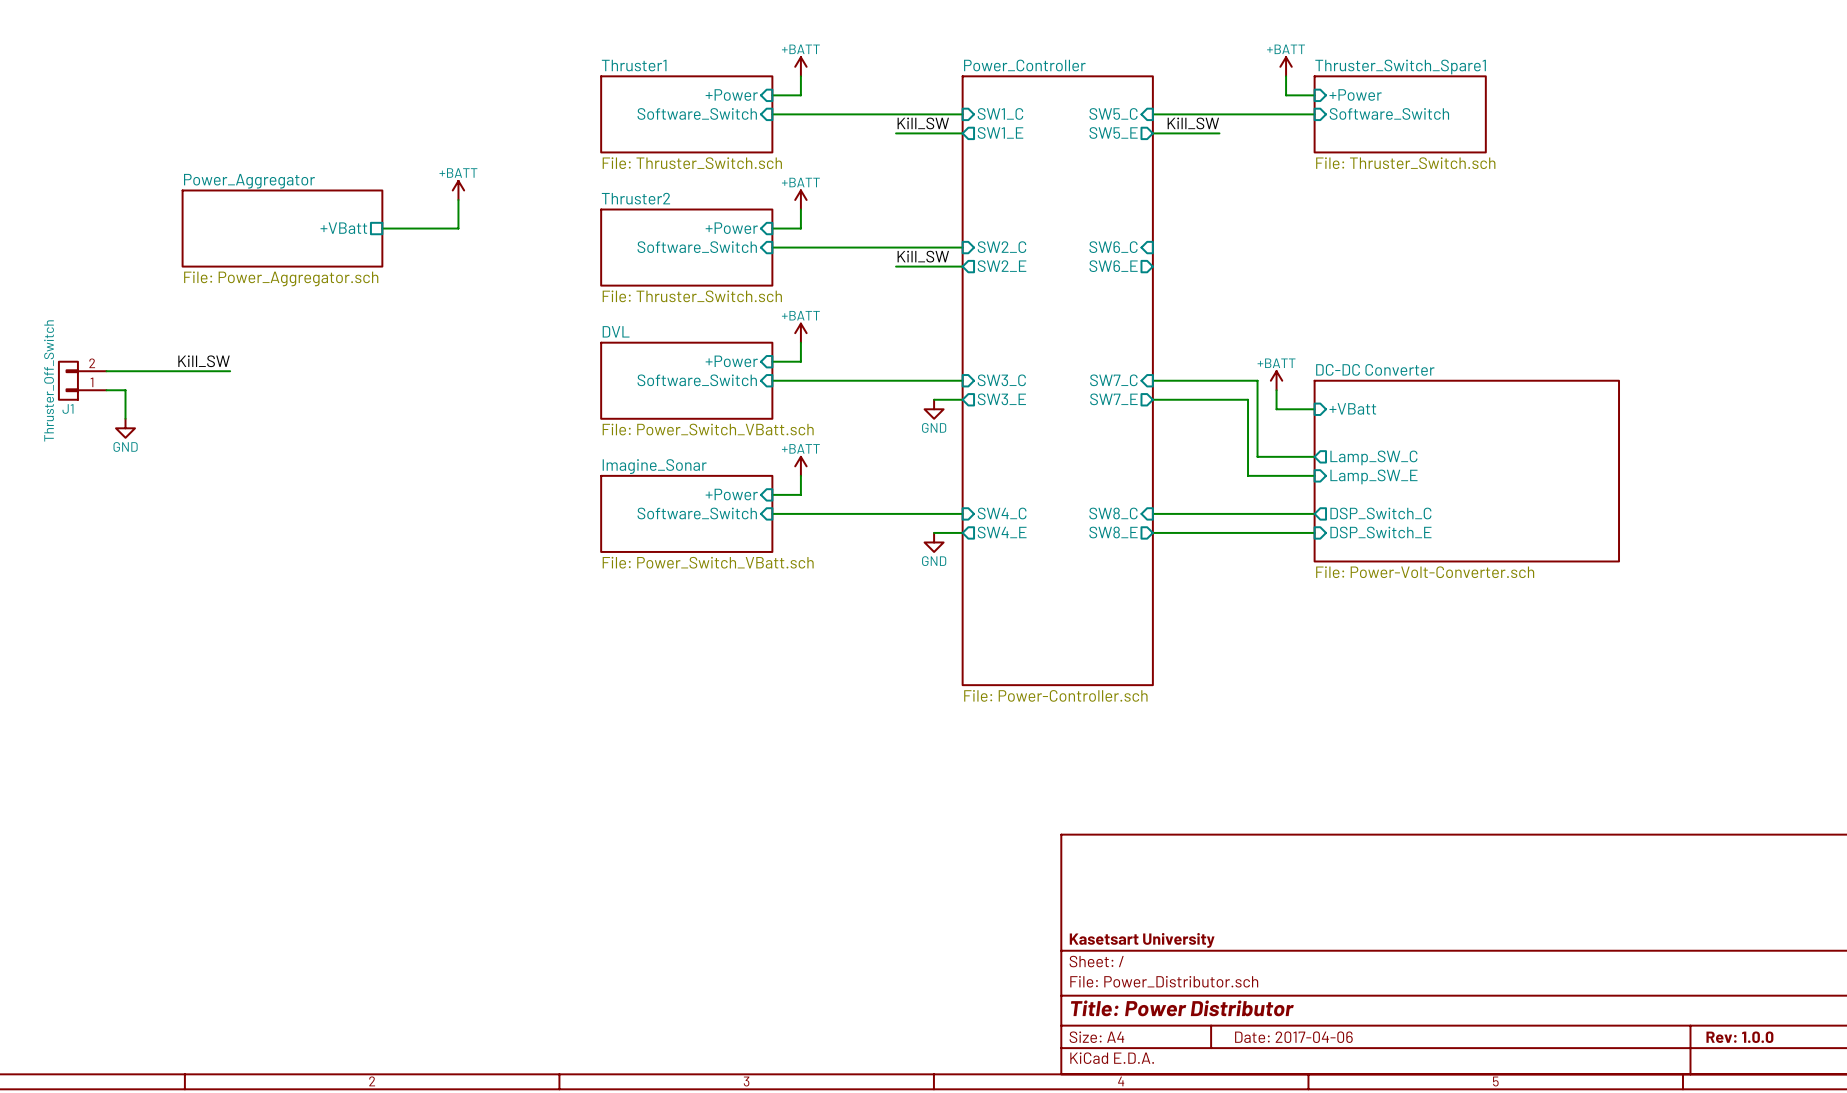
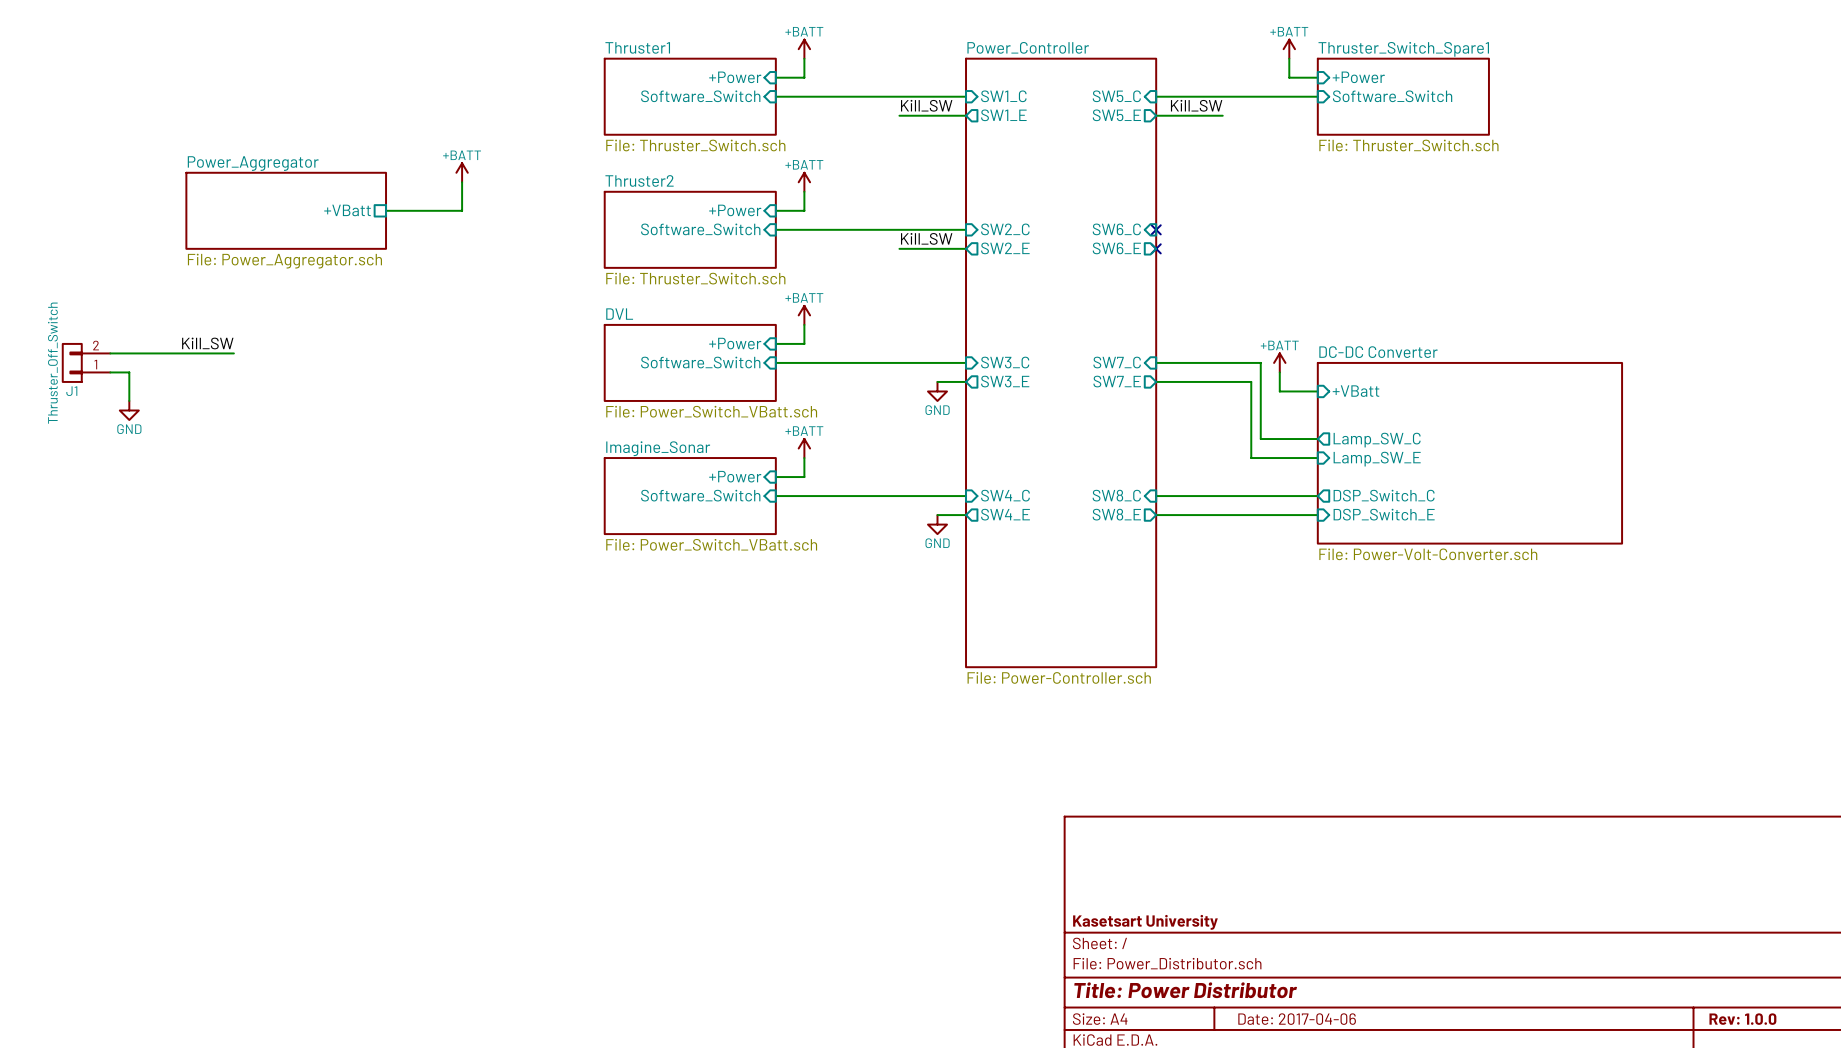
no-connect mark: none -> (1156, 229)
no-connect mark: none -> (1156, 248)

